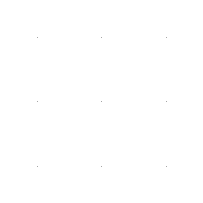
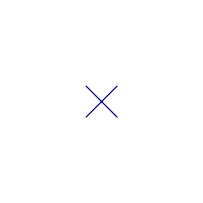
no-connect mark: none -> (101, 101)

